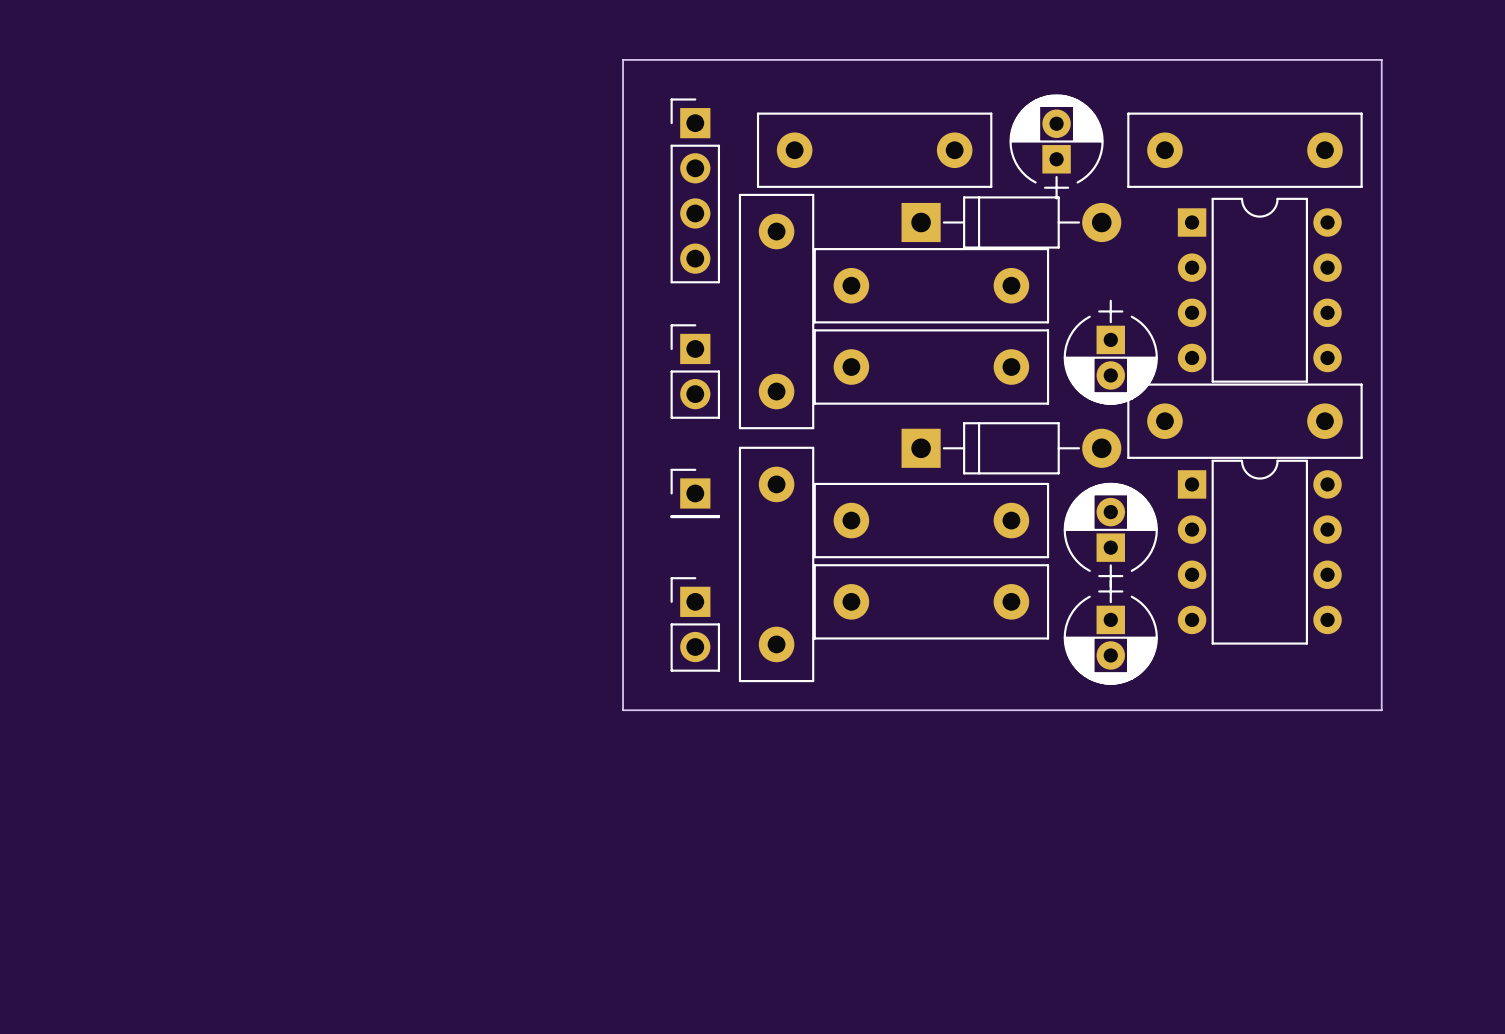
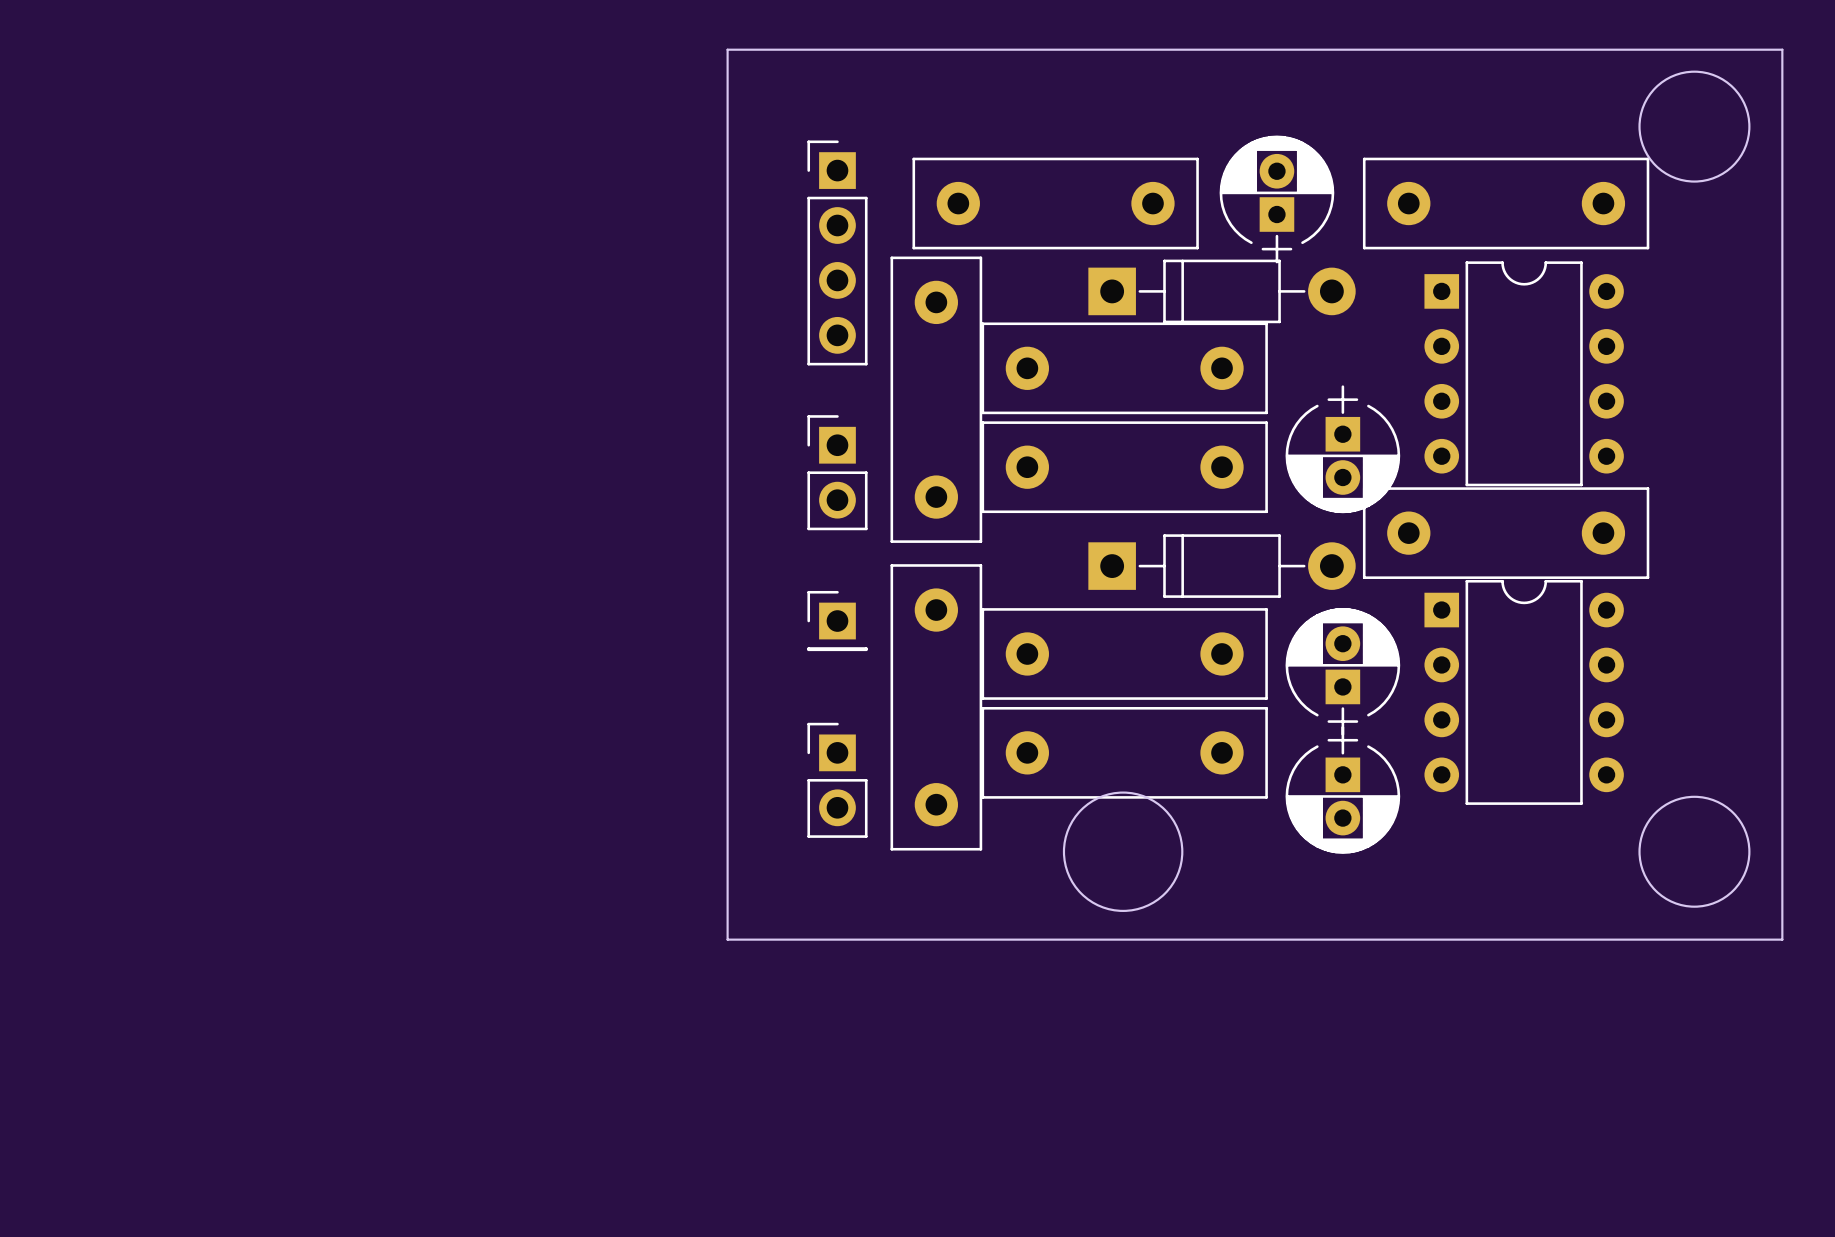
round board edge: none -> [1638, 70, 1751, 183]
board edge: (623, 59) (623, 710) (1381, 710) (1381, 59) (623, 59) -> (727, 49) (727, 939) (1782, 939) (1782, 49) (727, 49)
round board edge: none -> [1062, 791, 1184, 912]
round board edge: none -> [1638, 795, 1751, 908]

